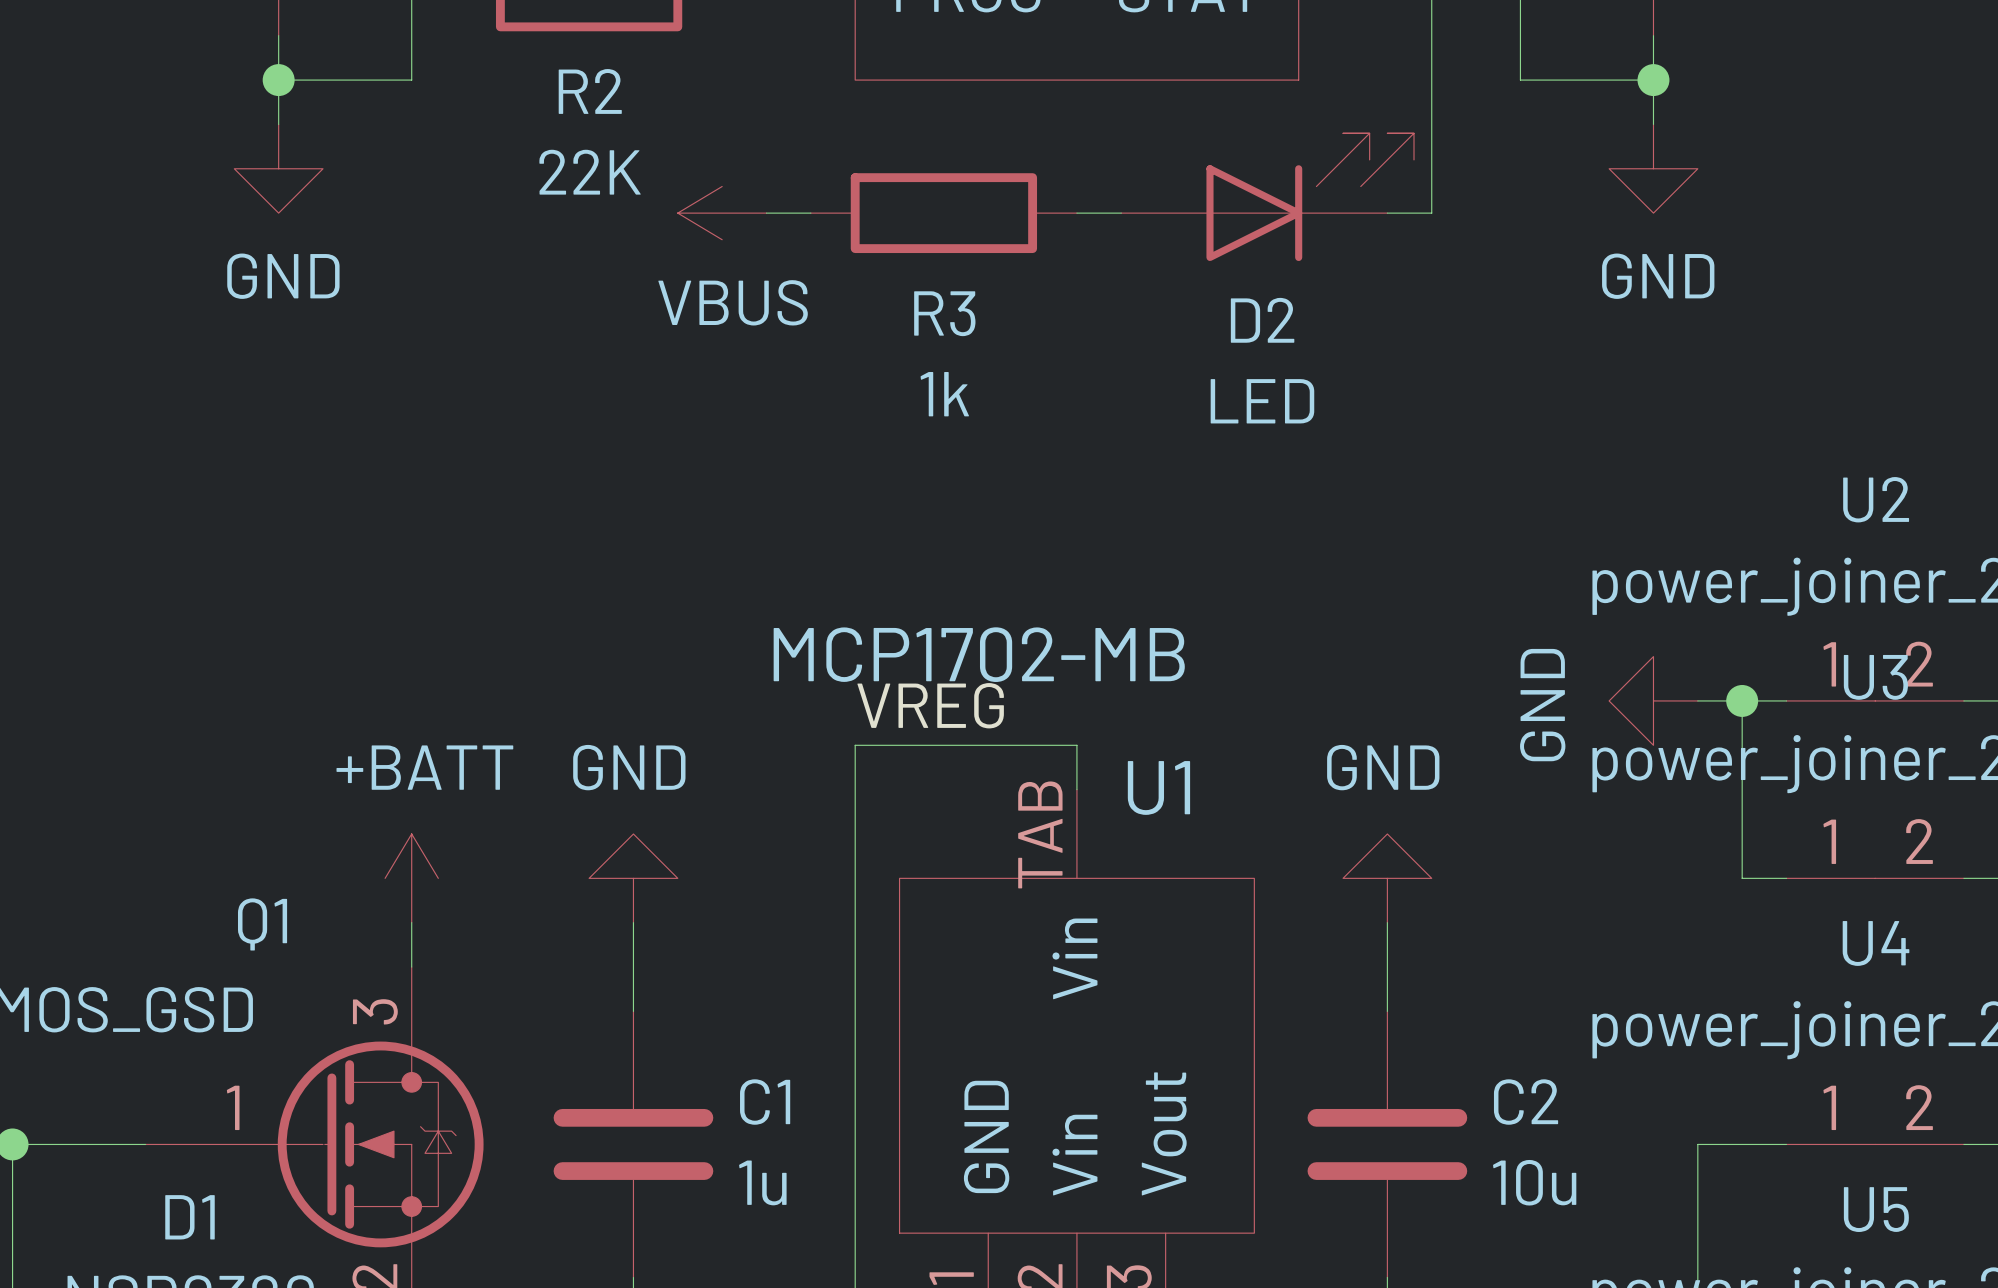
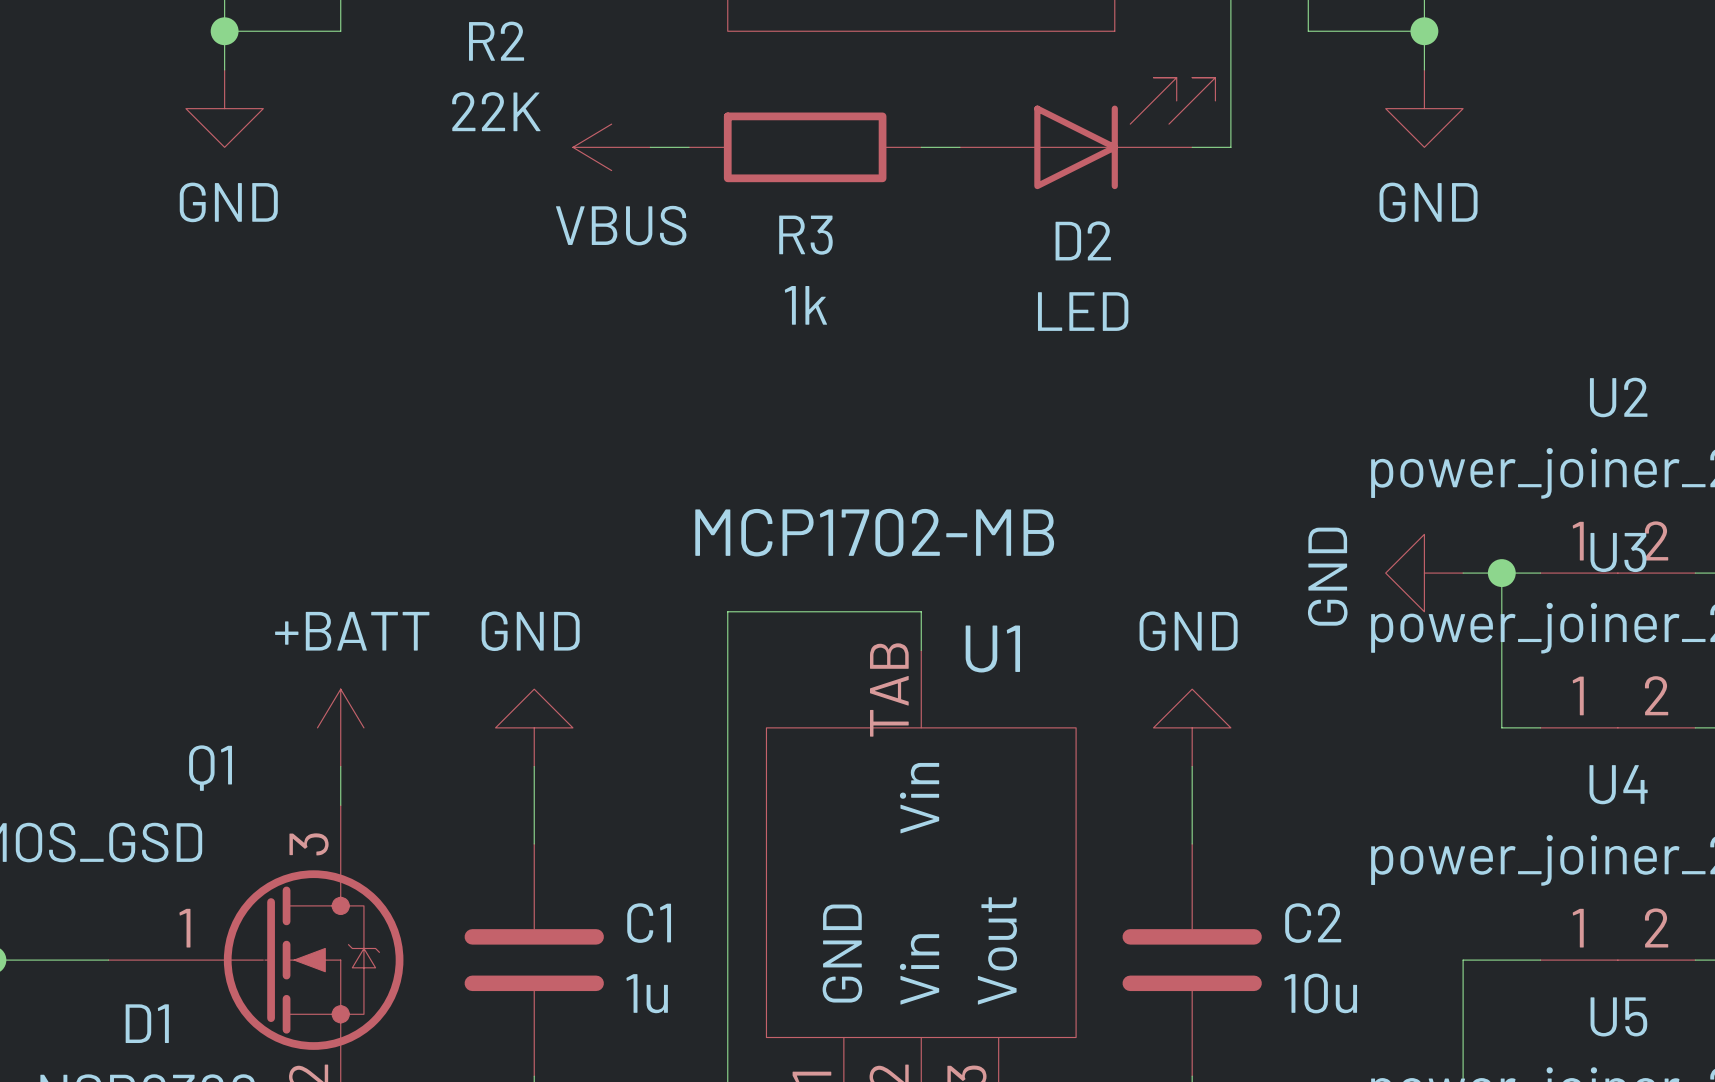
U1 value position: MCP1702-MB (979, 654) -> MCP1702-MB (874, 532)
label: VREG (930, 705) -> none

